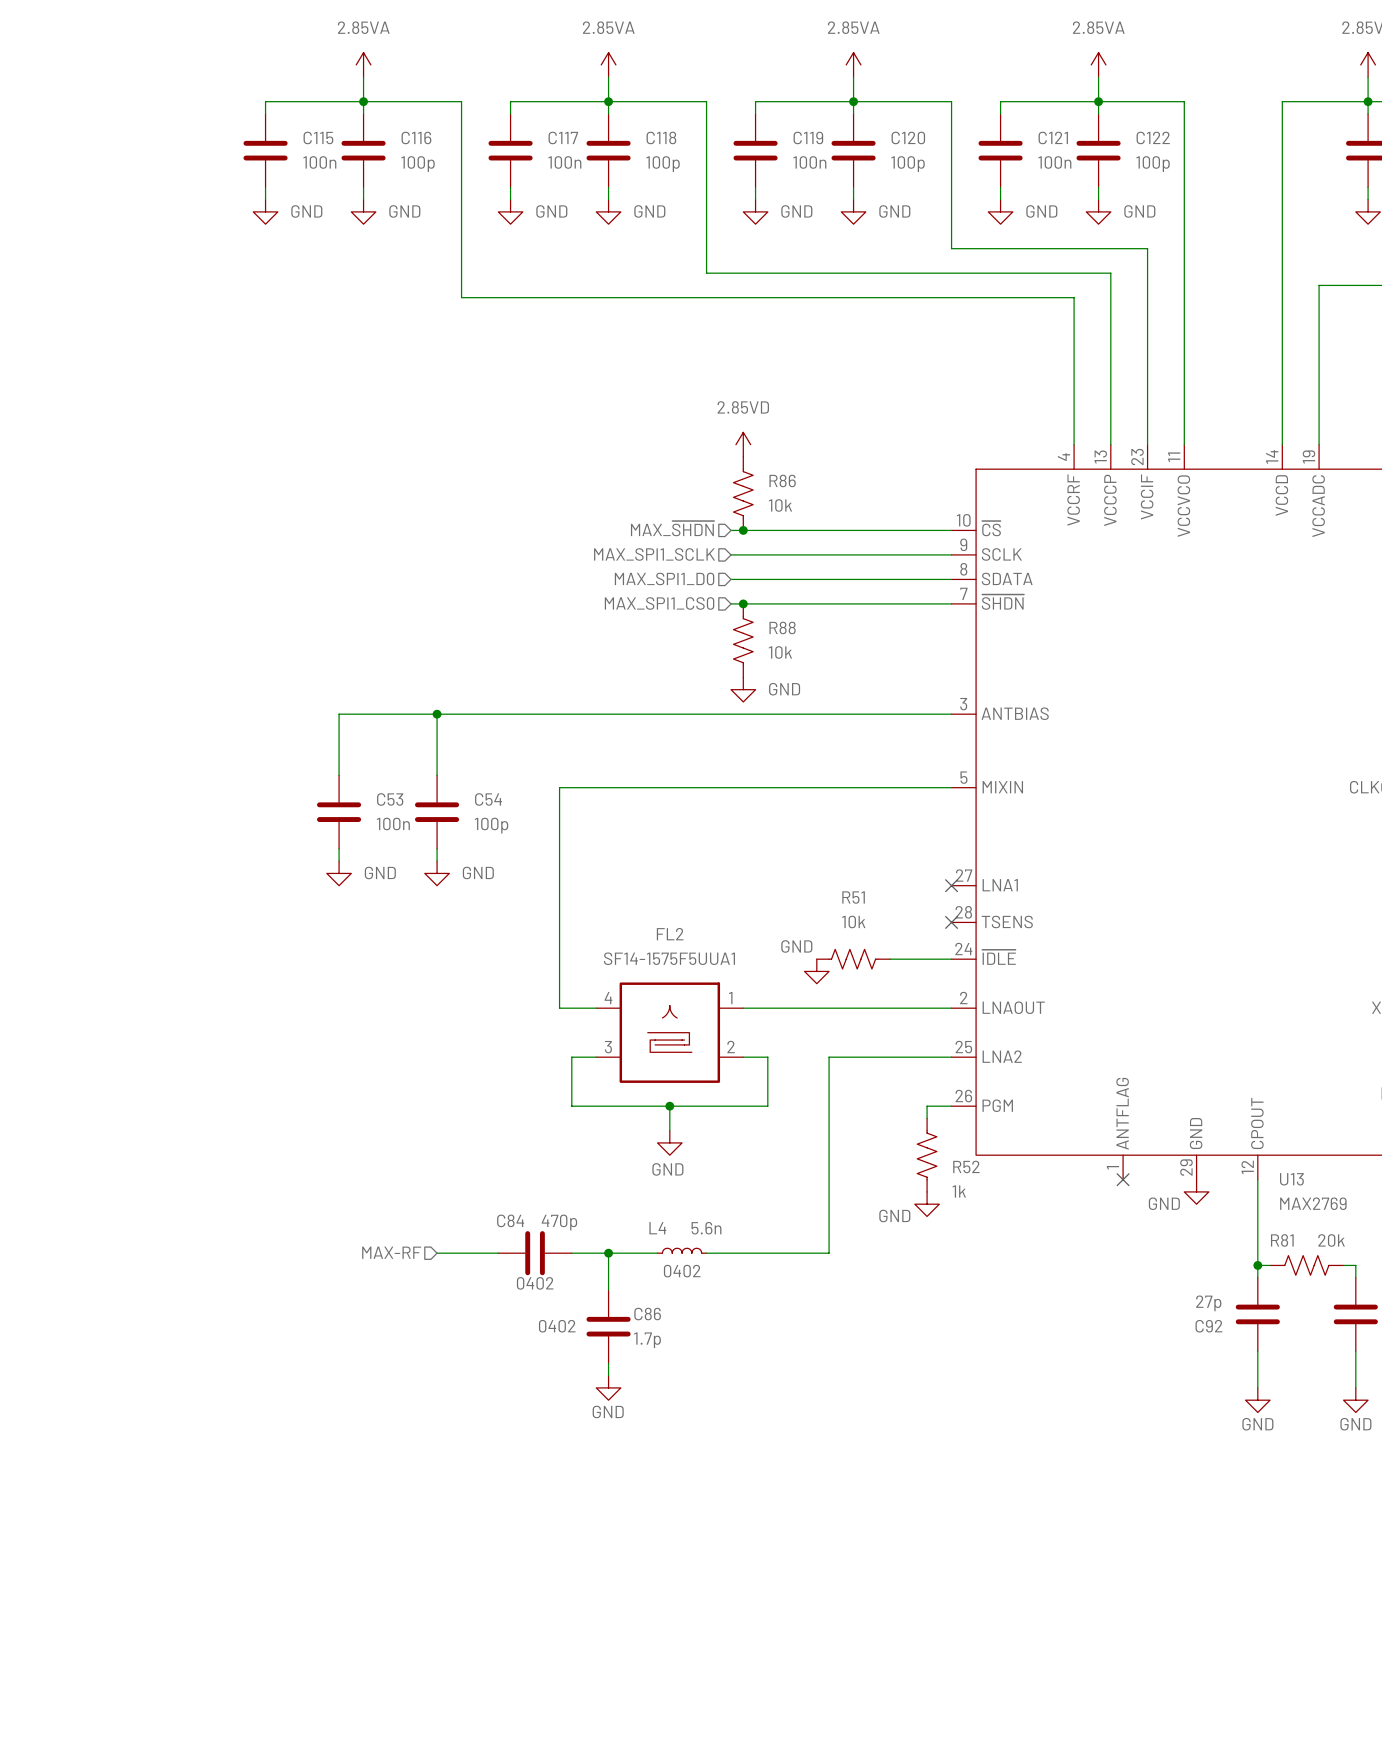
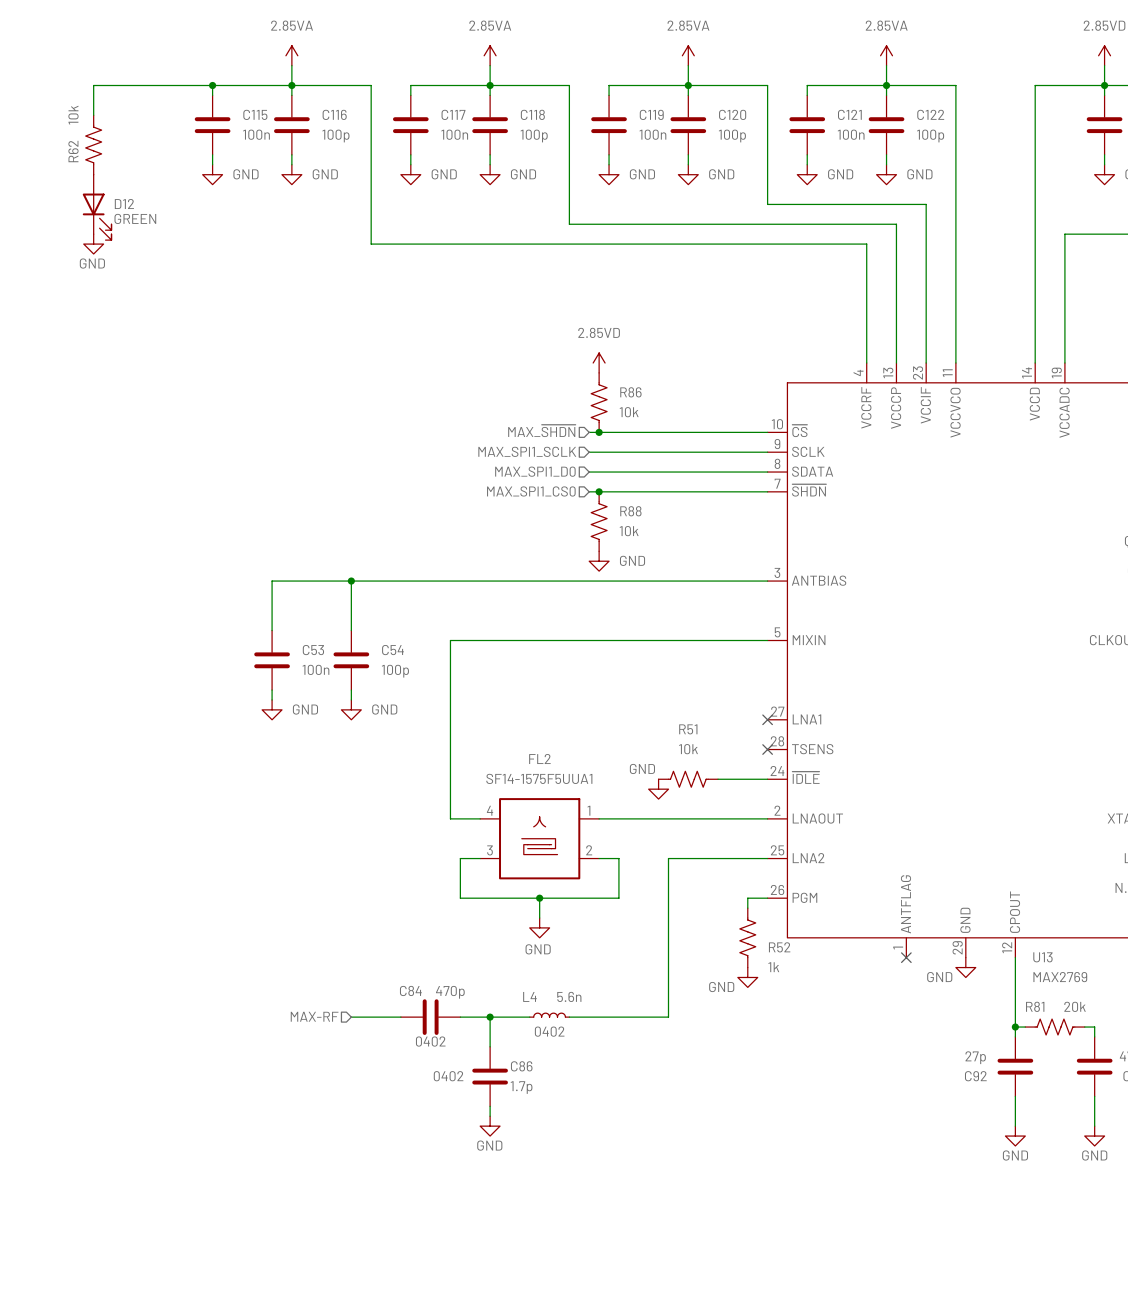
wire: none -> (212, 85) (93, 85) (93, 115)
junction: none -> (212, 85)
R62: none -> 10k (93, 144)
D12: none -> GREEN (97, 207)
power symbol: none -> GND (93, 244)

